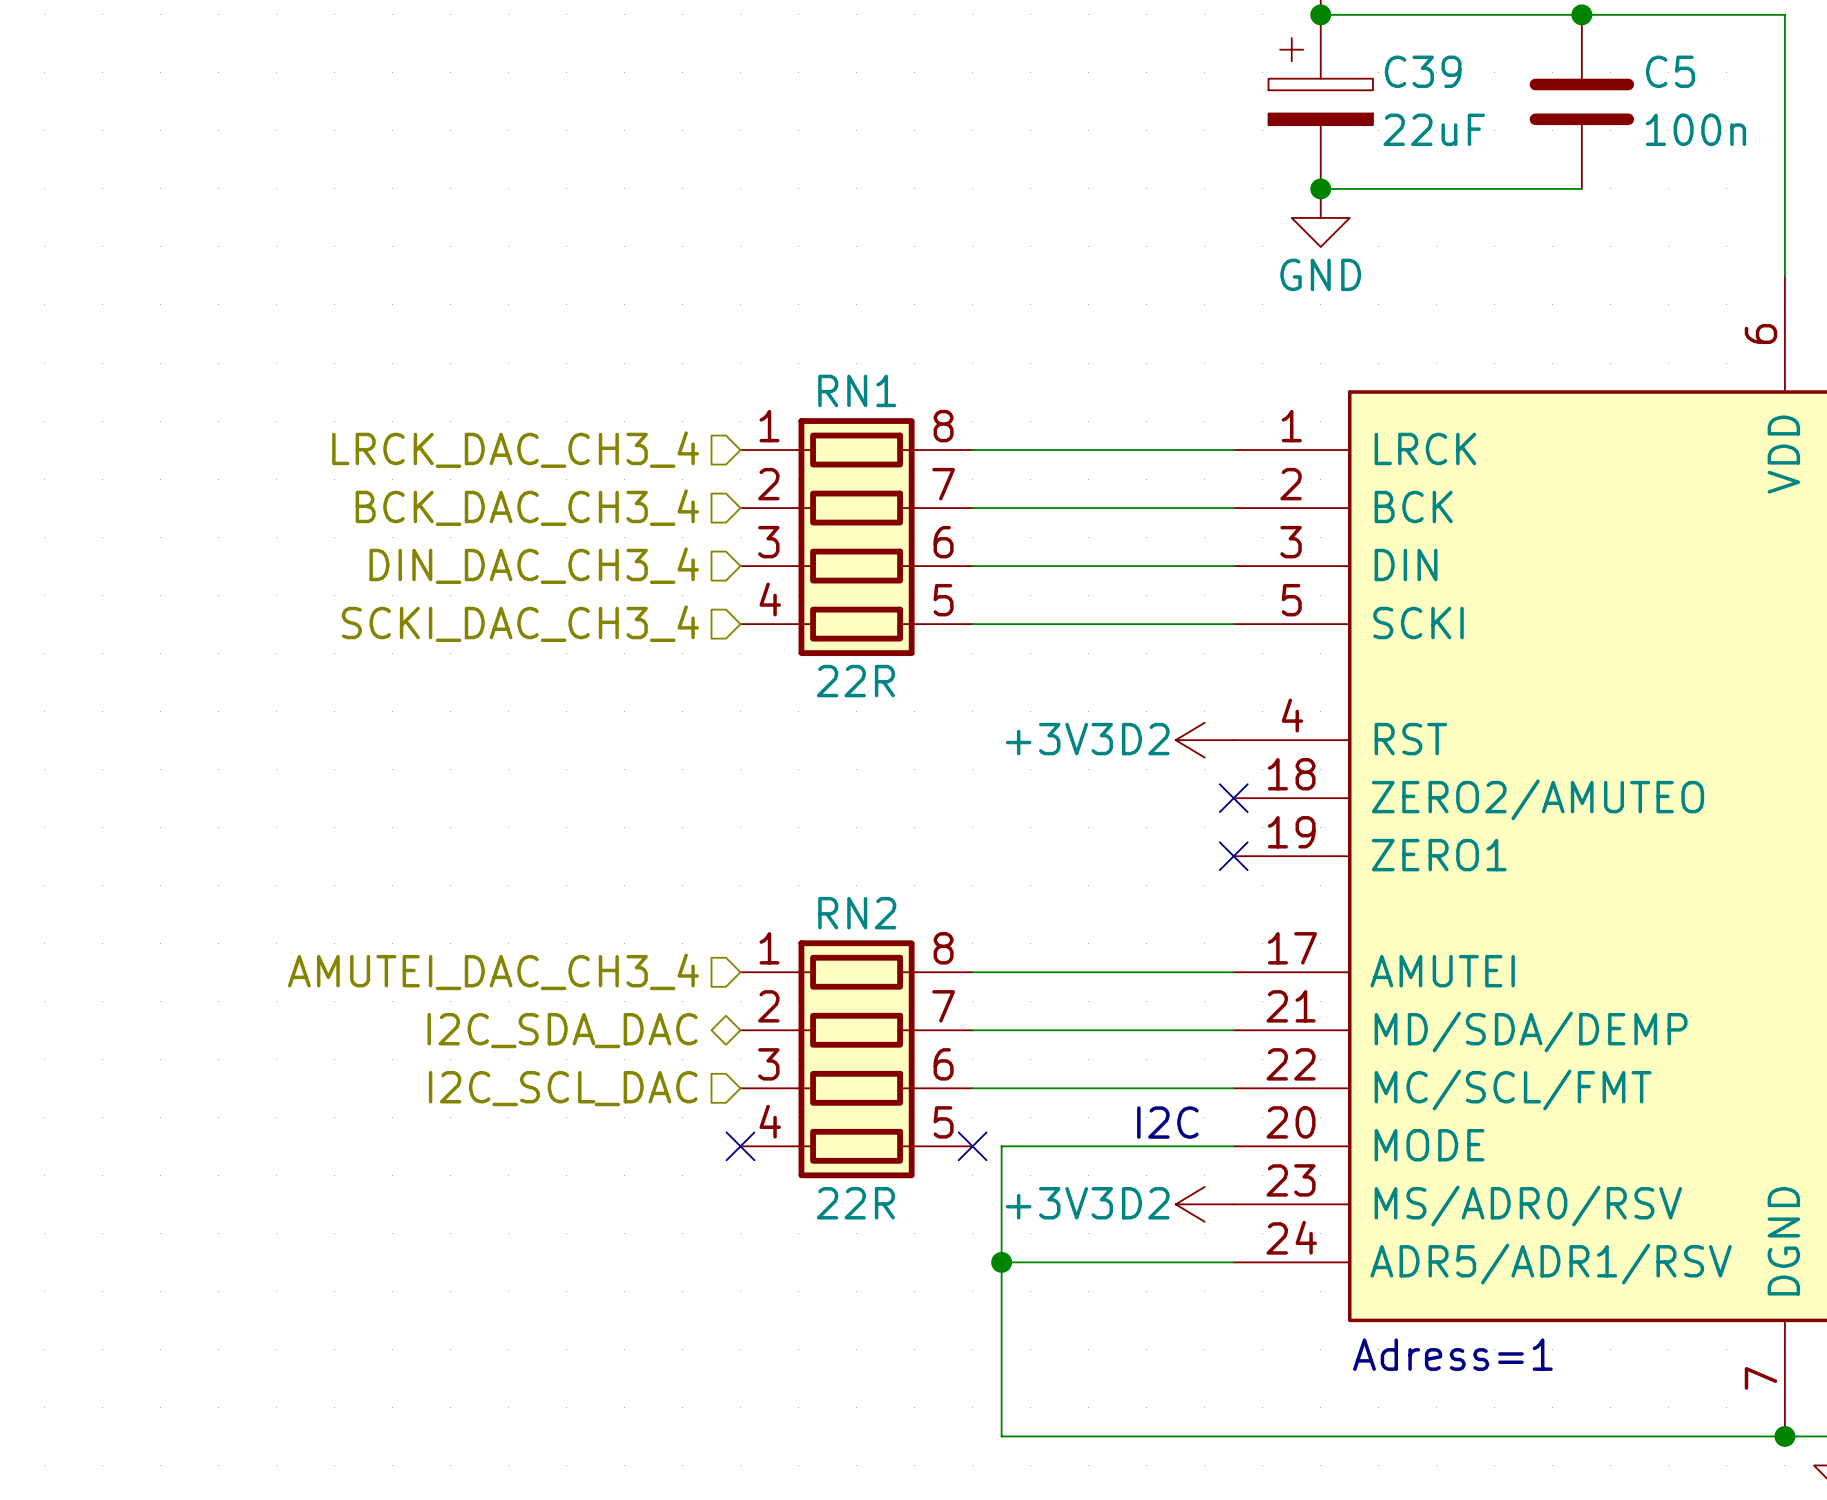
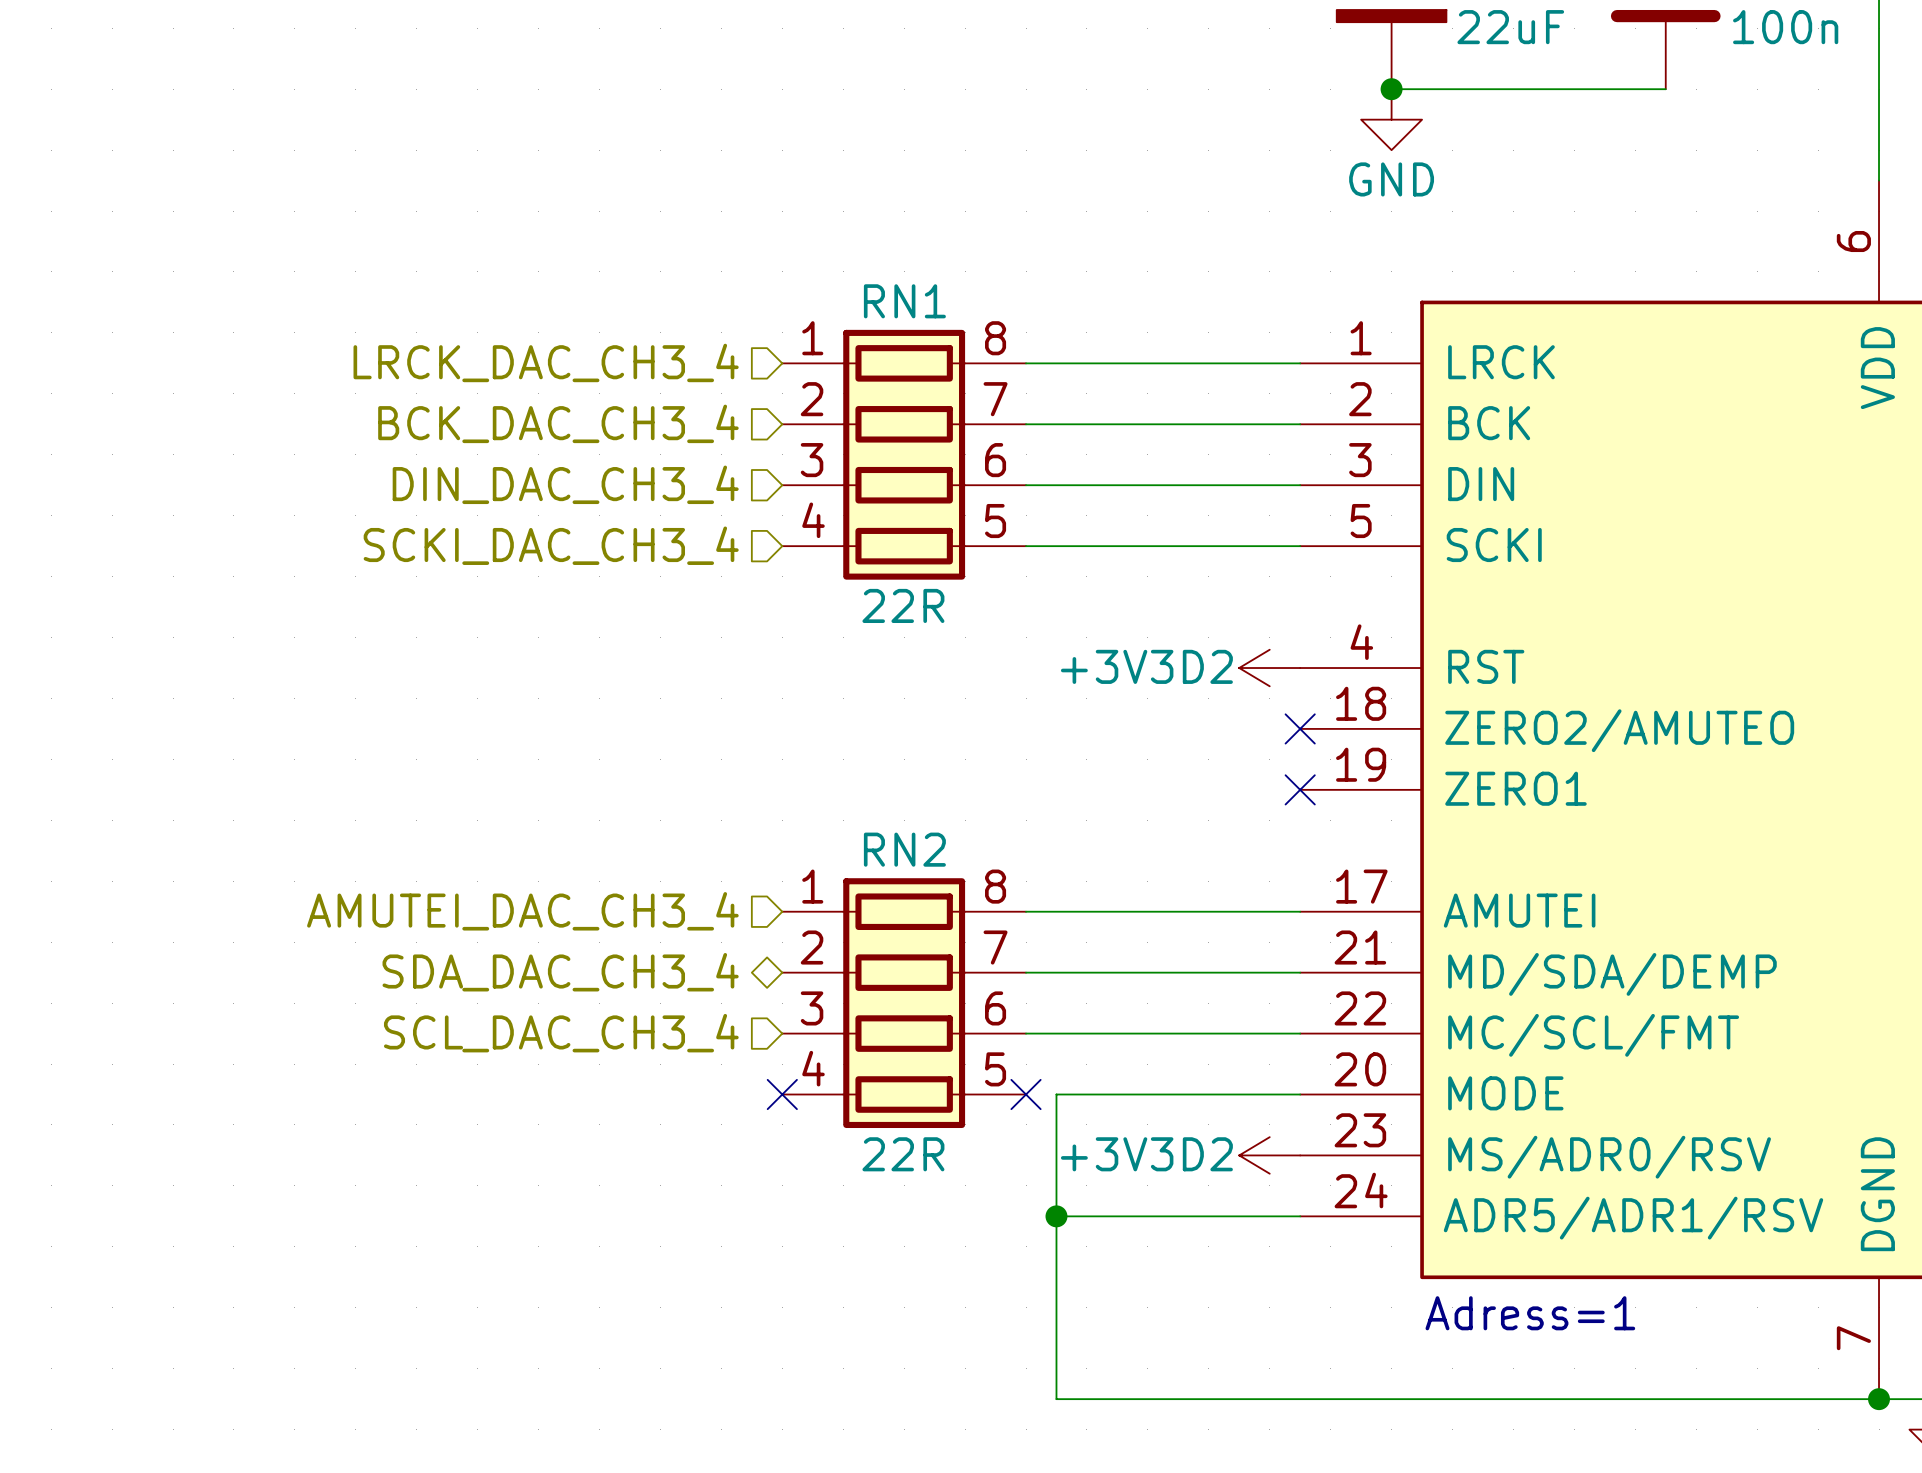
hierarchical label: I2C_SDA_DAC (562, 1030) -> SDA_DAC_CH3_4 (560, 972)
hierarchical label: I2C_SCL_DAC (563, 1088) -> SCL_DAC_CH3_4 (561, 1033)
text: I2C (1167, 1122) -> none

